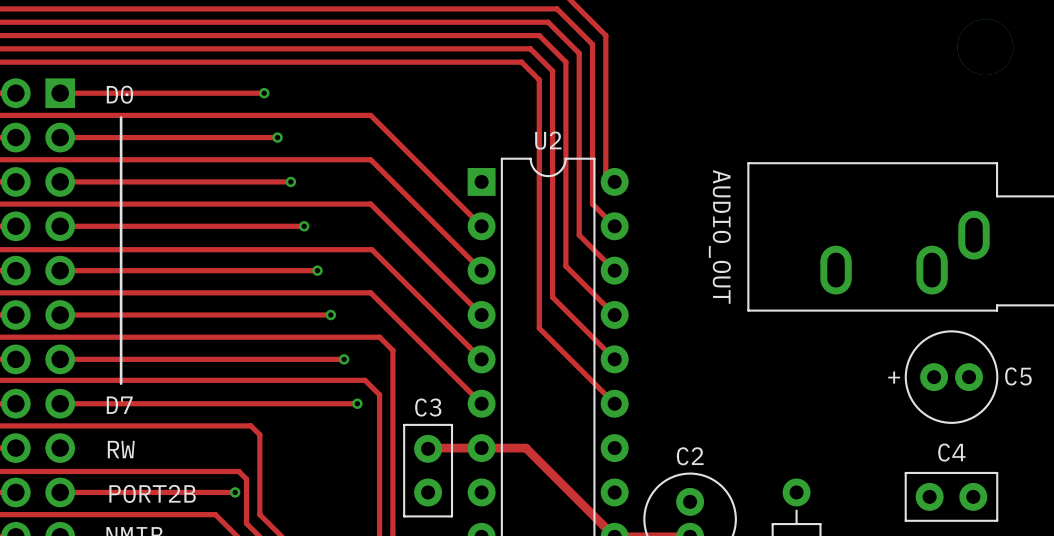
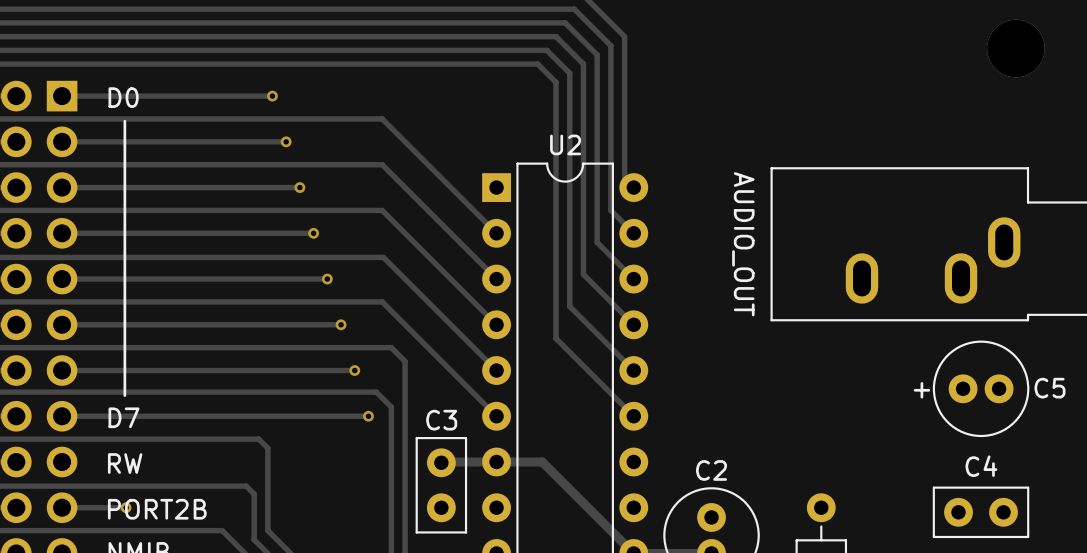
track: (122, 492) (235, 492) -> none
via: none -> (126, 507)
via: (235, 492) -> none

